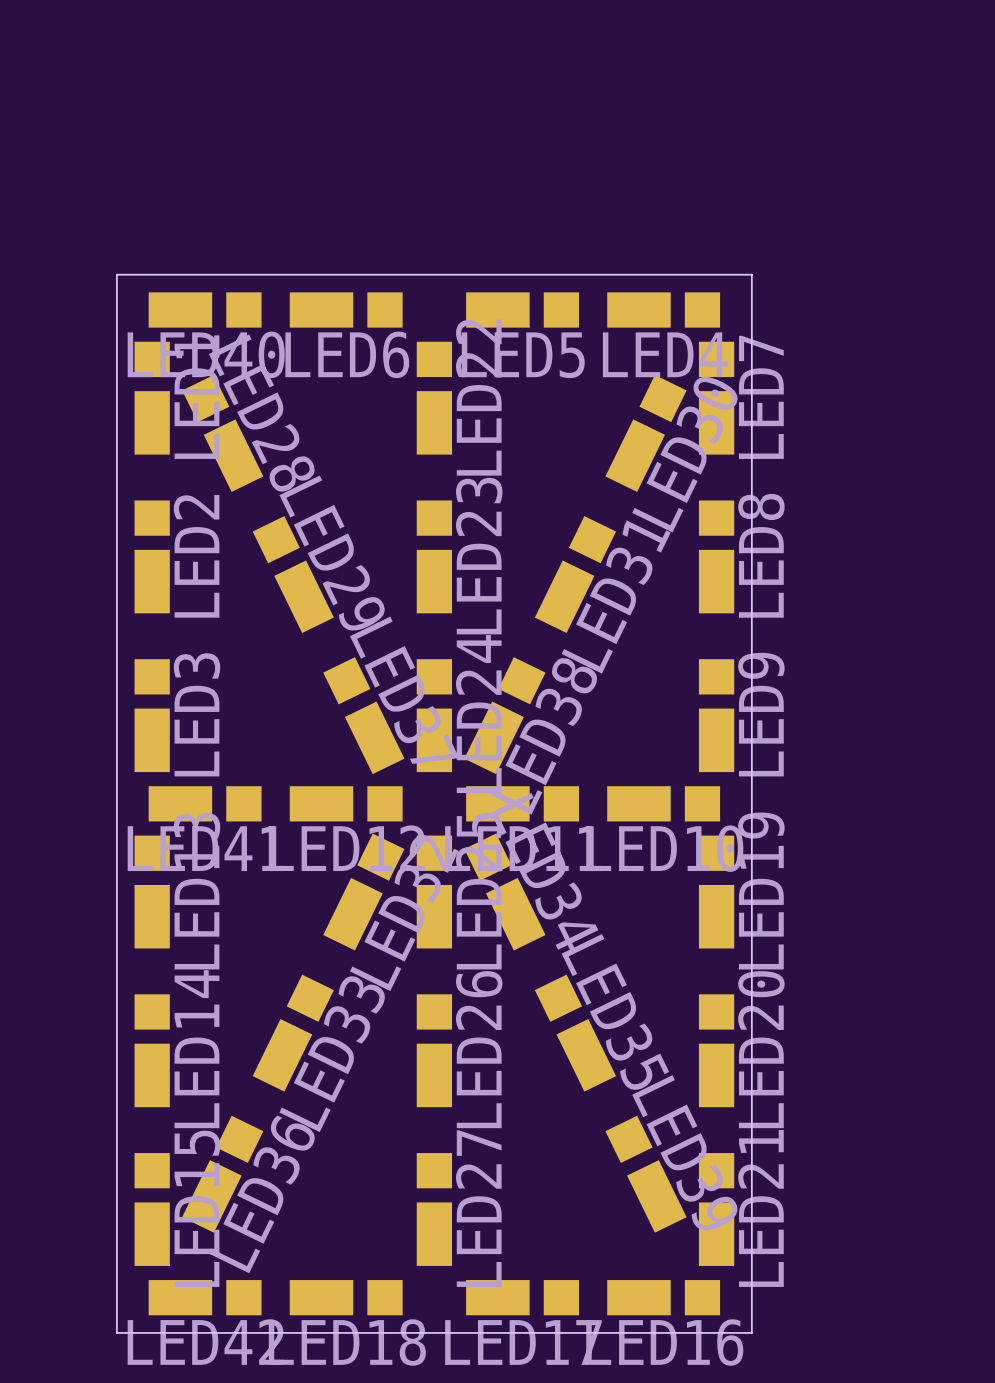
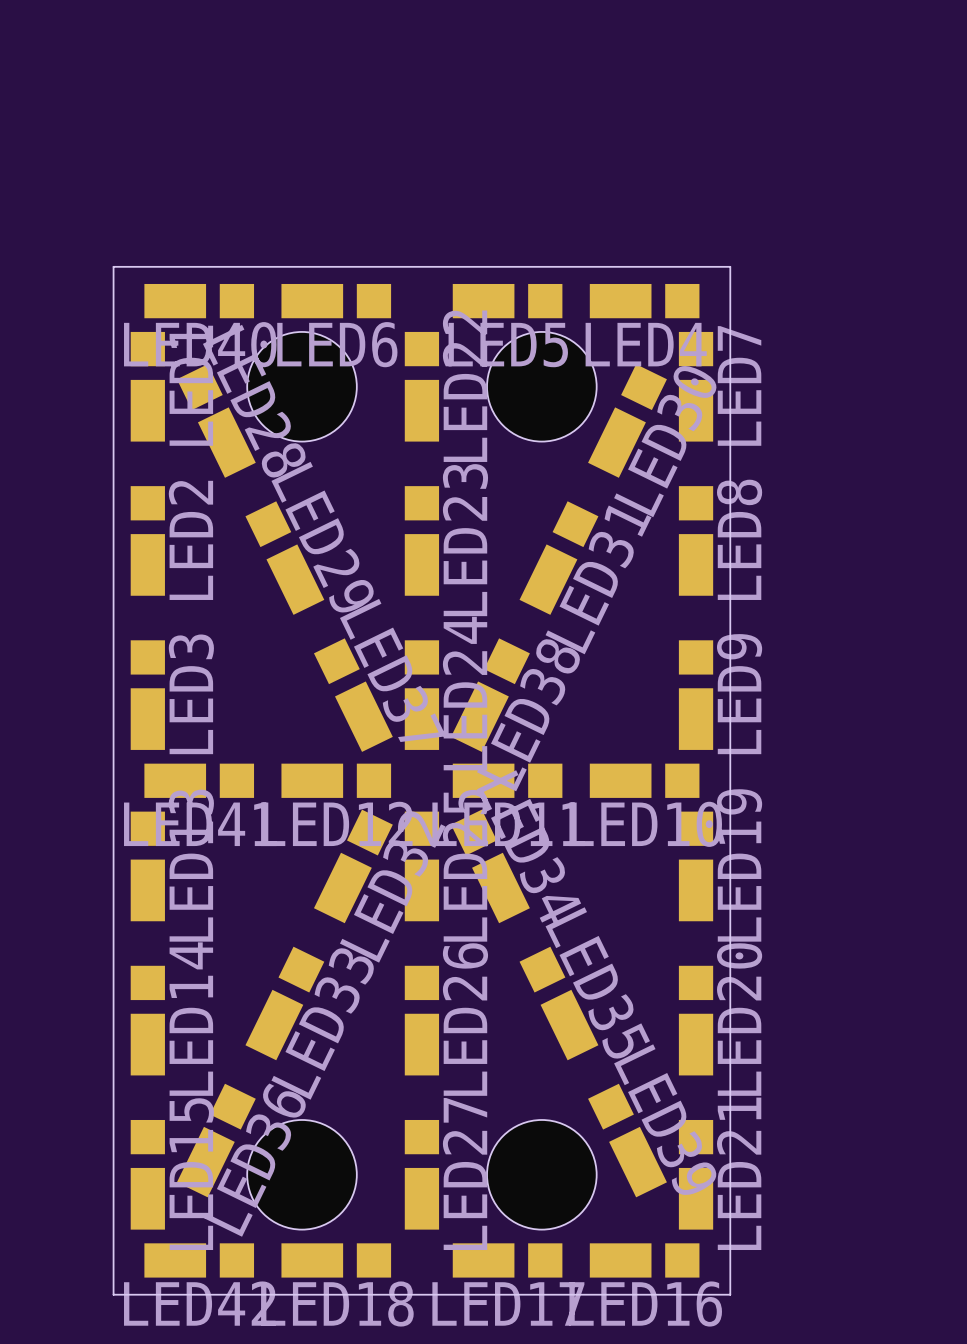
hole: none -> (302, 386)
hole: none -> (541, 386)
hole: none -> (302, 1174)
hole: none -> (541, 1174)

